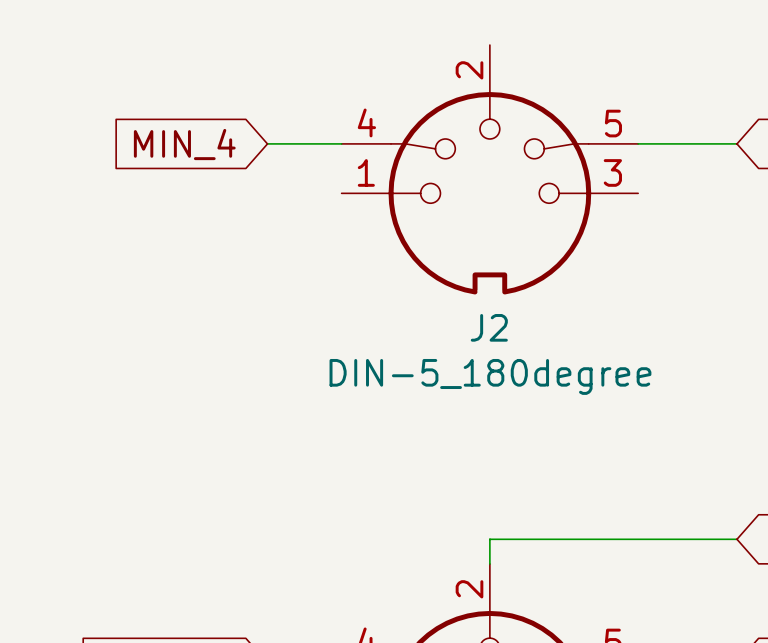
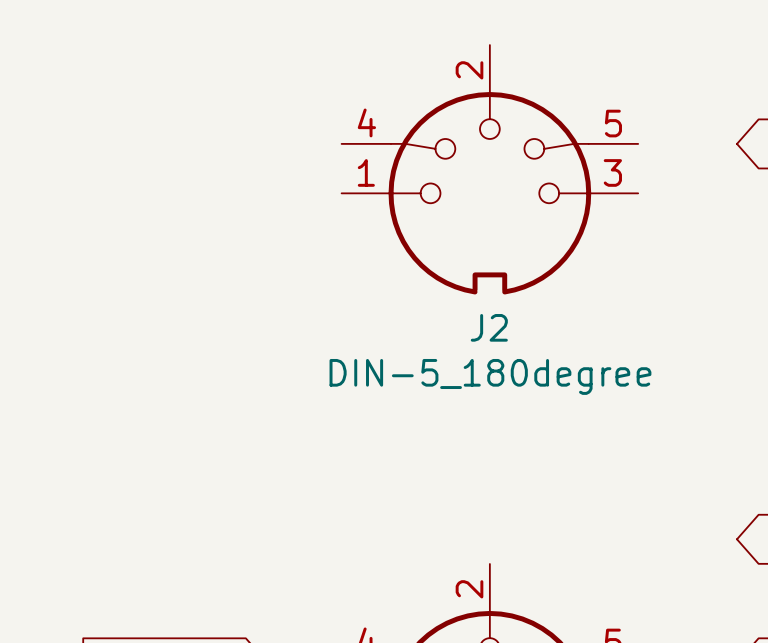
wire: (267, 143) (341, 143) -> none
wire: (638, 143) (737, 143) -> none
global label: MIN_4 (184, 144) -> none
wire: (737, 539) (489, 539) (489, 564) -> none

